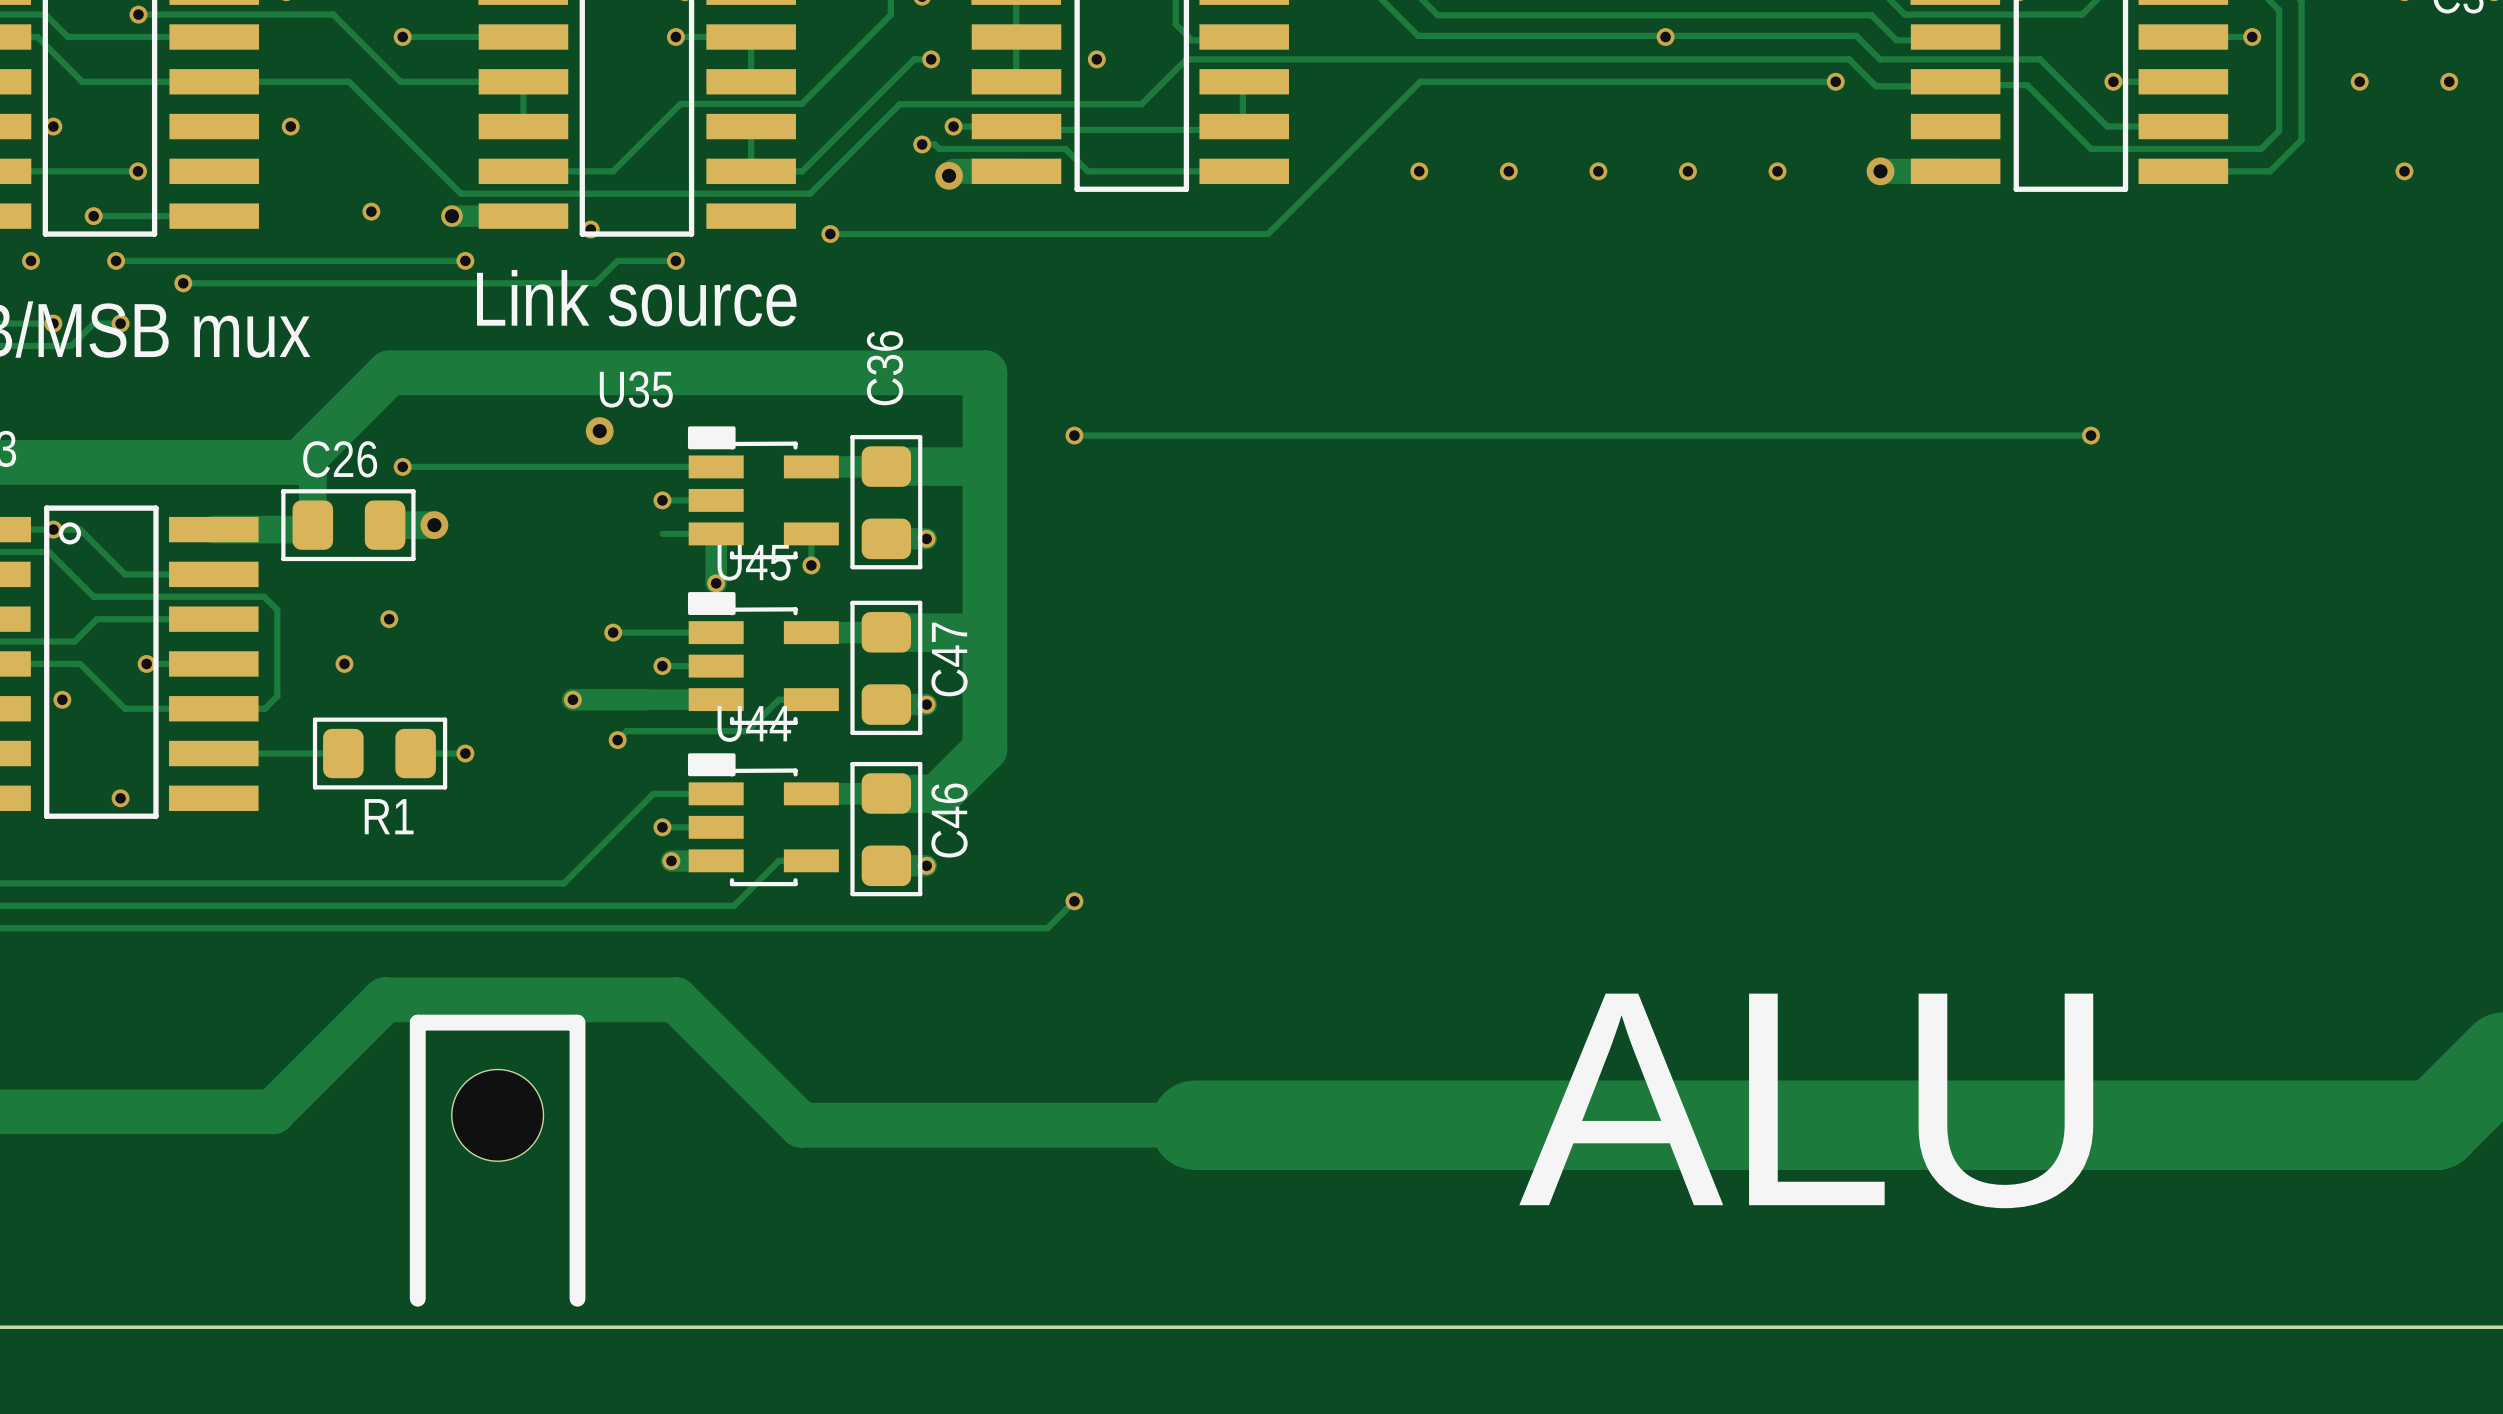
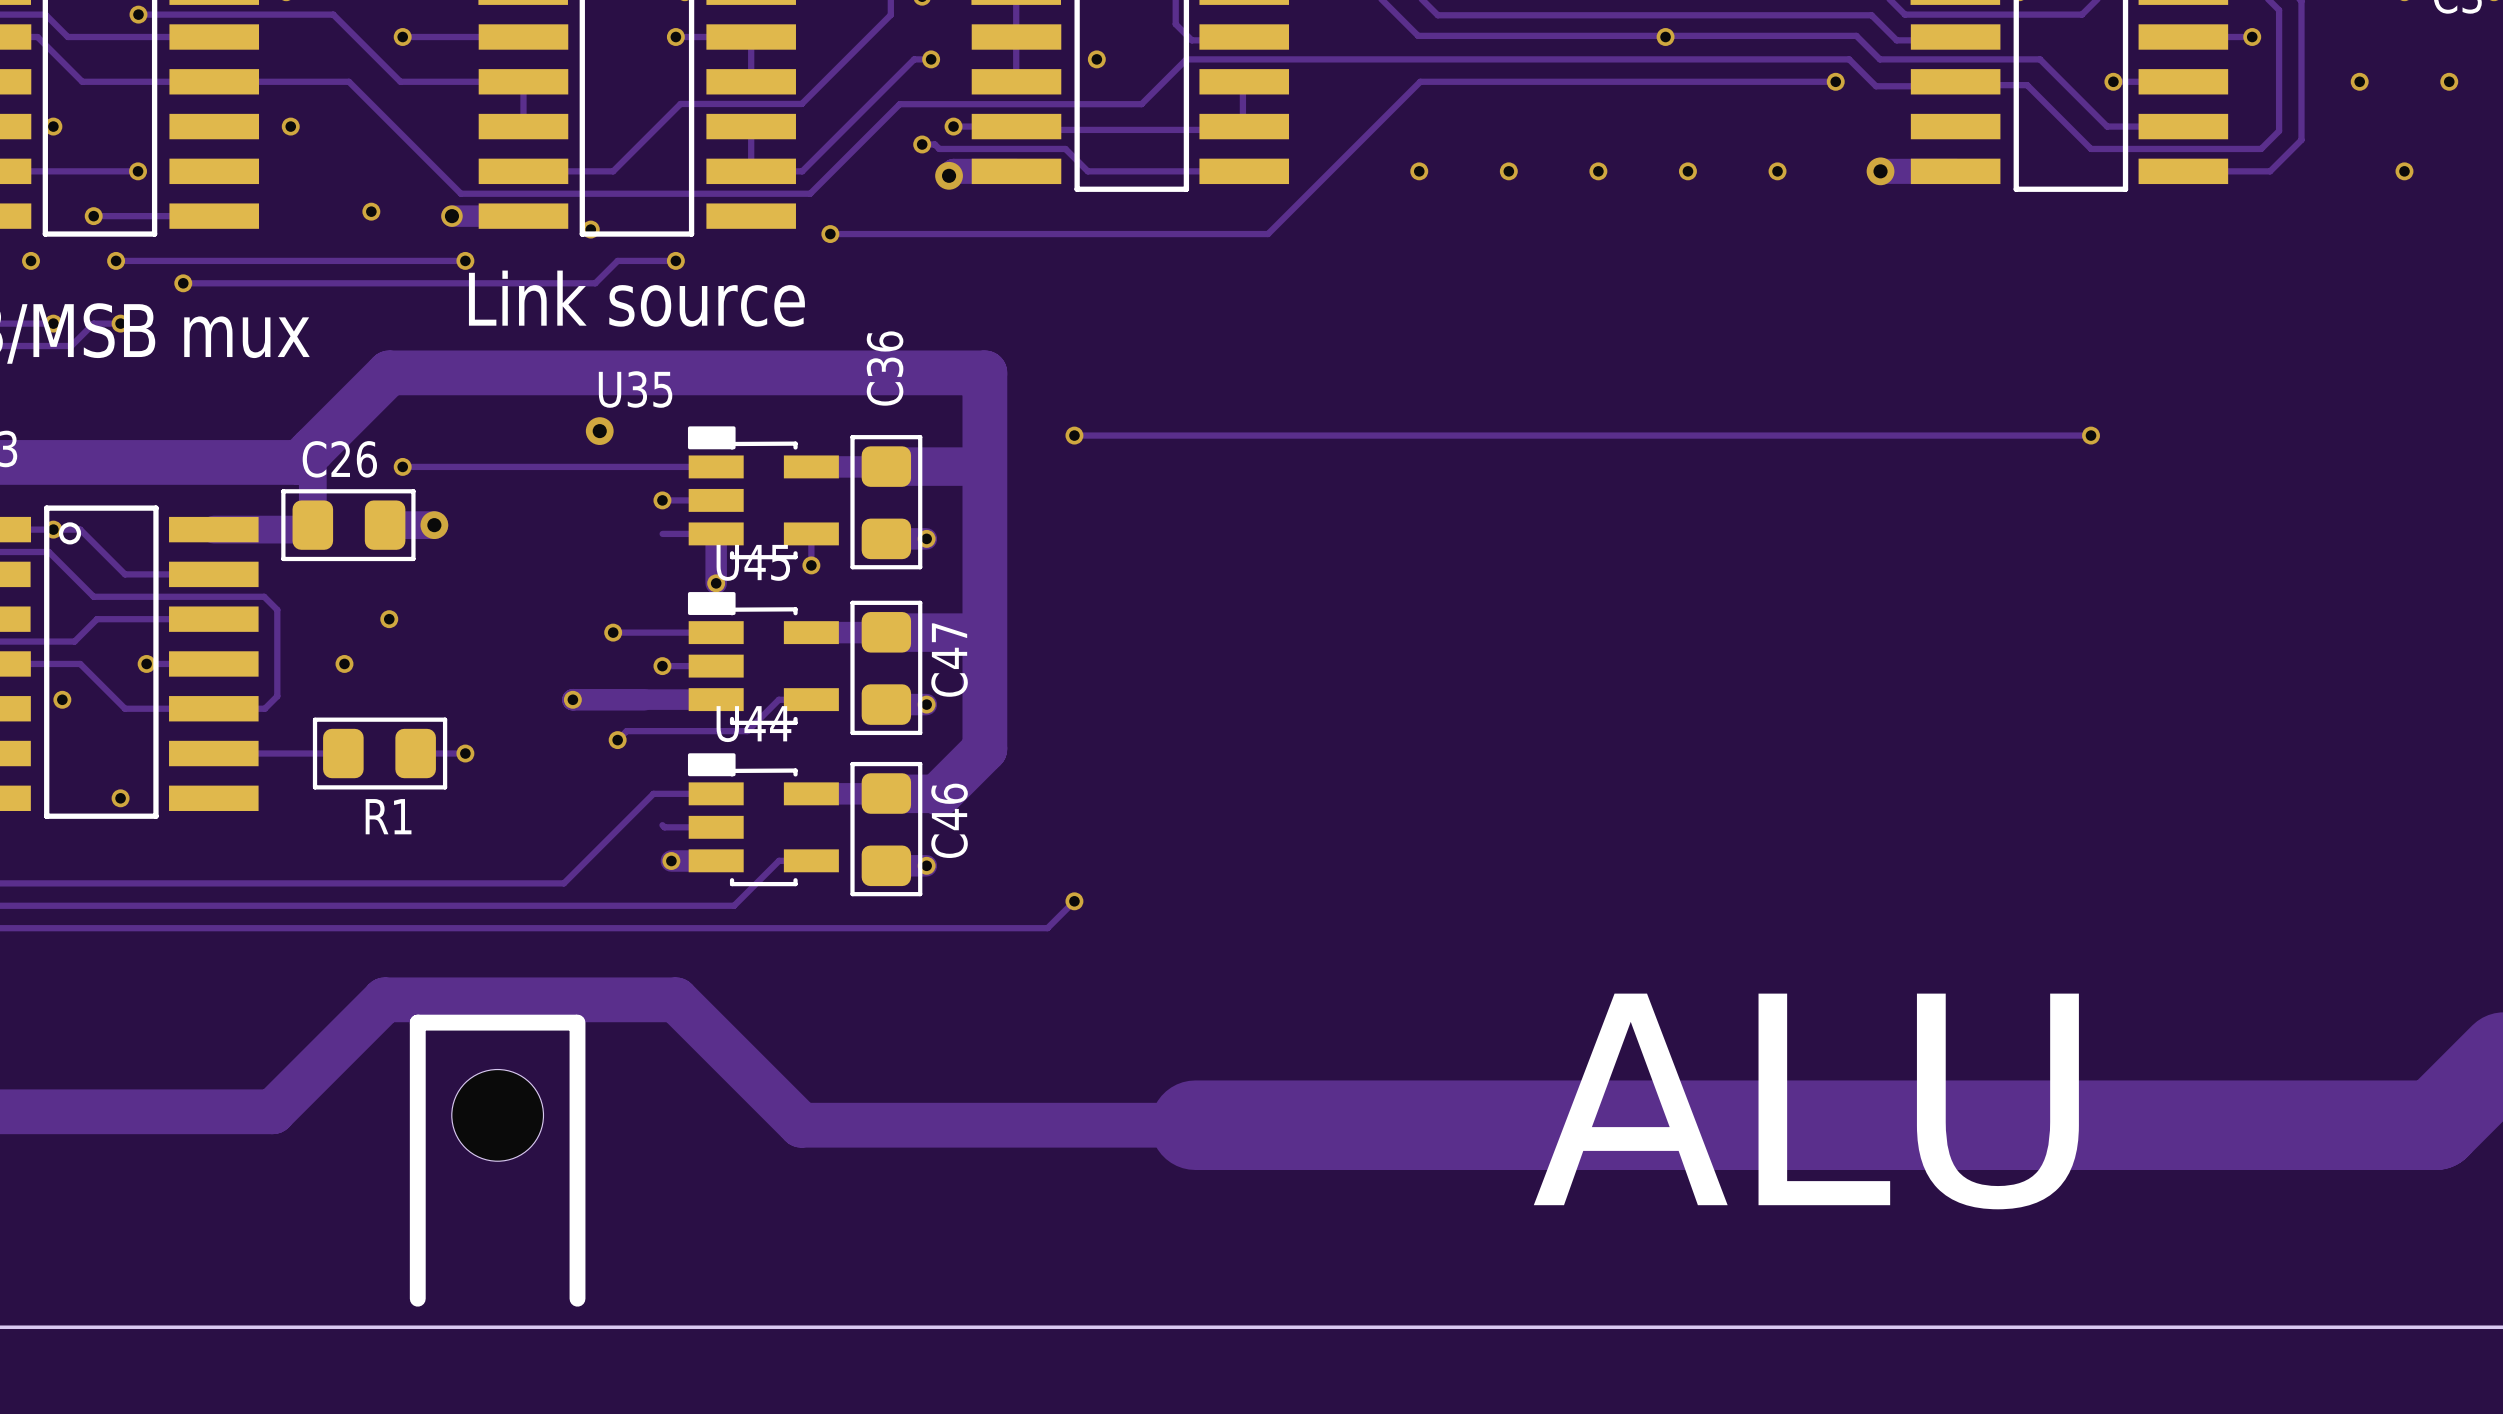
via: (662, 827) -> none

